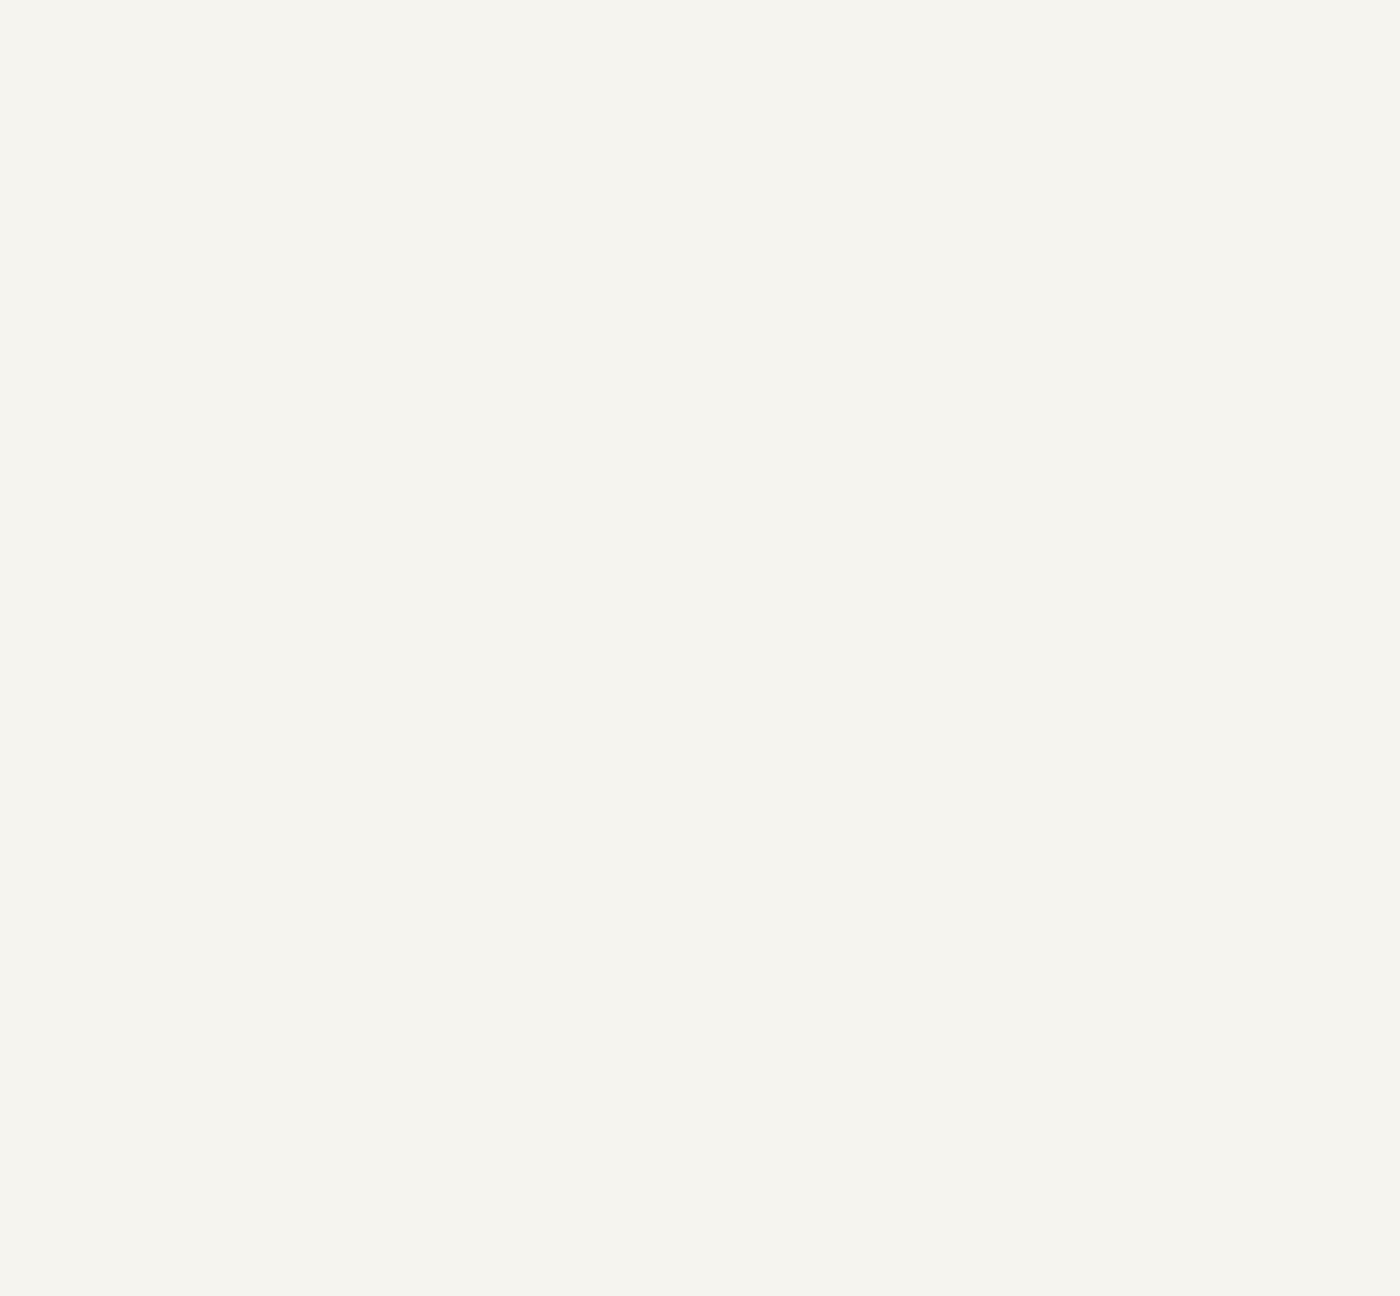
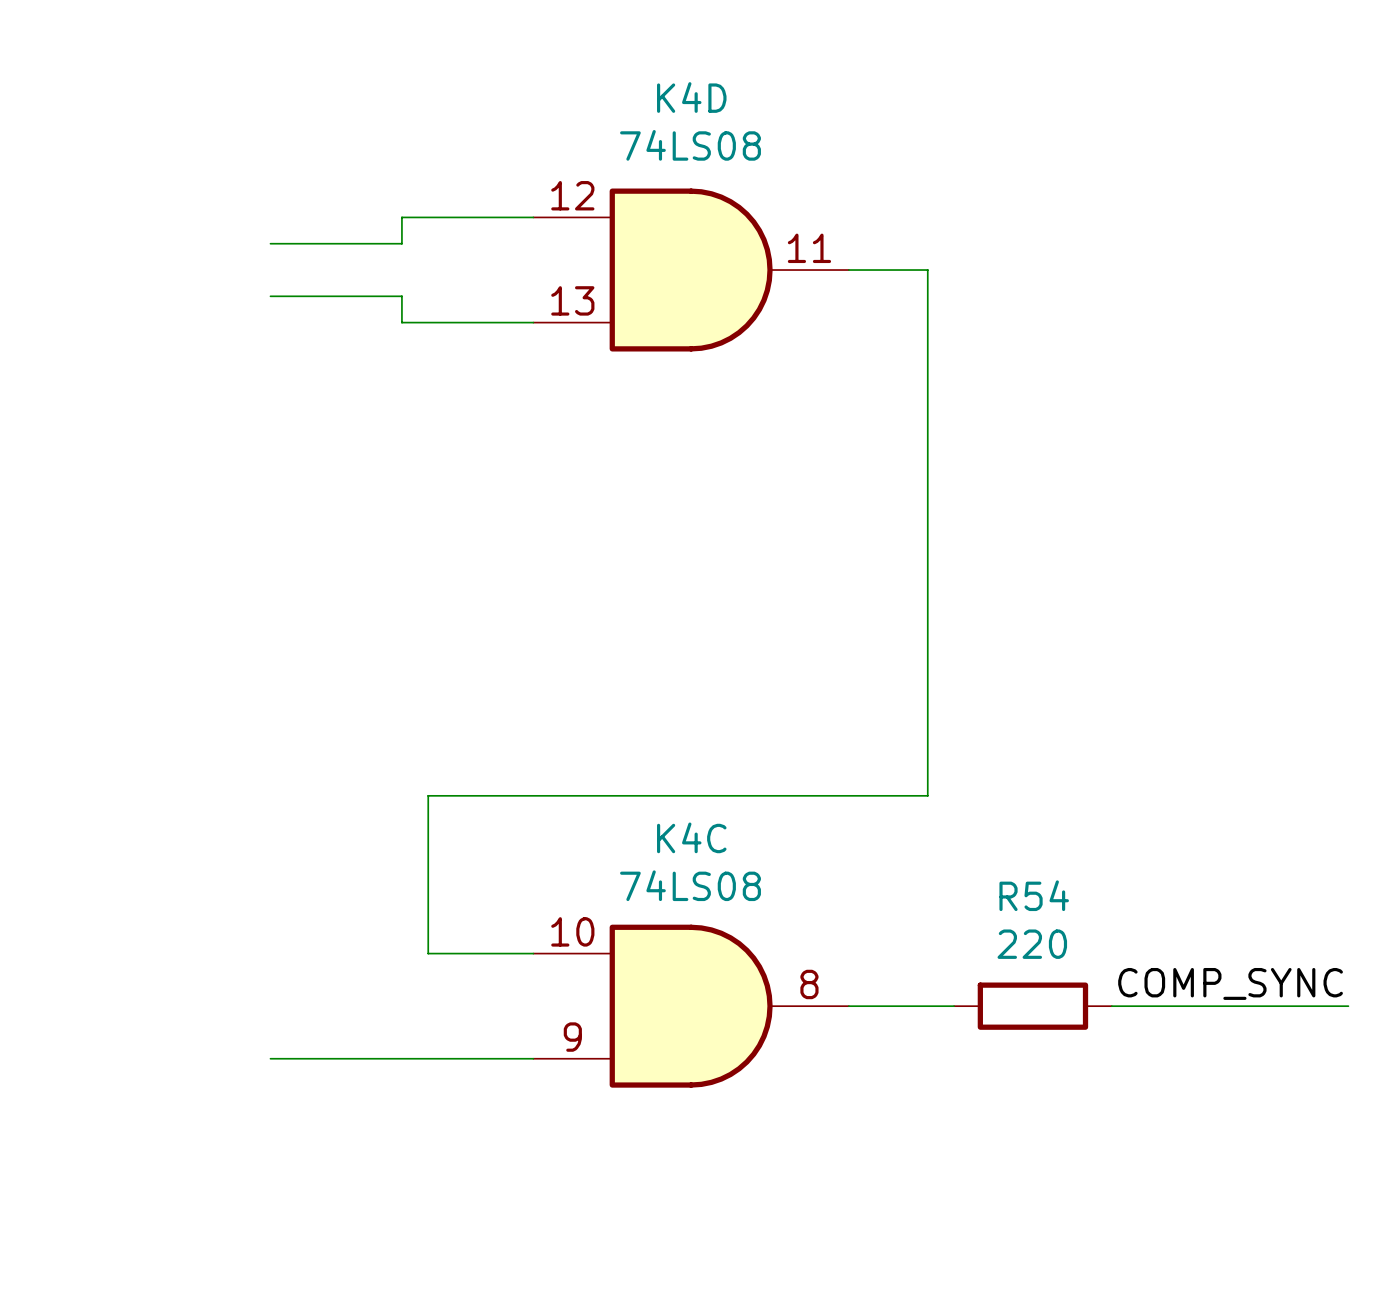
wire: none -> (533, 217) (401, 217) (401, 243) (270, 243)
K4D: none -> 74LS08 (691, 270)
wire: none -> (848, 270) (927, 270) (927, 795) (428, 795) (428, 953) (533, 953)
wire: none -> (270, 296) (401, 296) (401, 322) (533, 322)
label: none -> COMP_SYNC (1230, 983)
K4C: none -> 74LS08 (691, 1006)
wire: none -> (848, 1006) (954, 1006)
R54: none -> 220 (1032, 1006)
wire: none -> (1111, 1006) (1348, 1006)
wire: none -> (270, 1058) (533, 1058)

